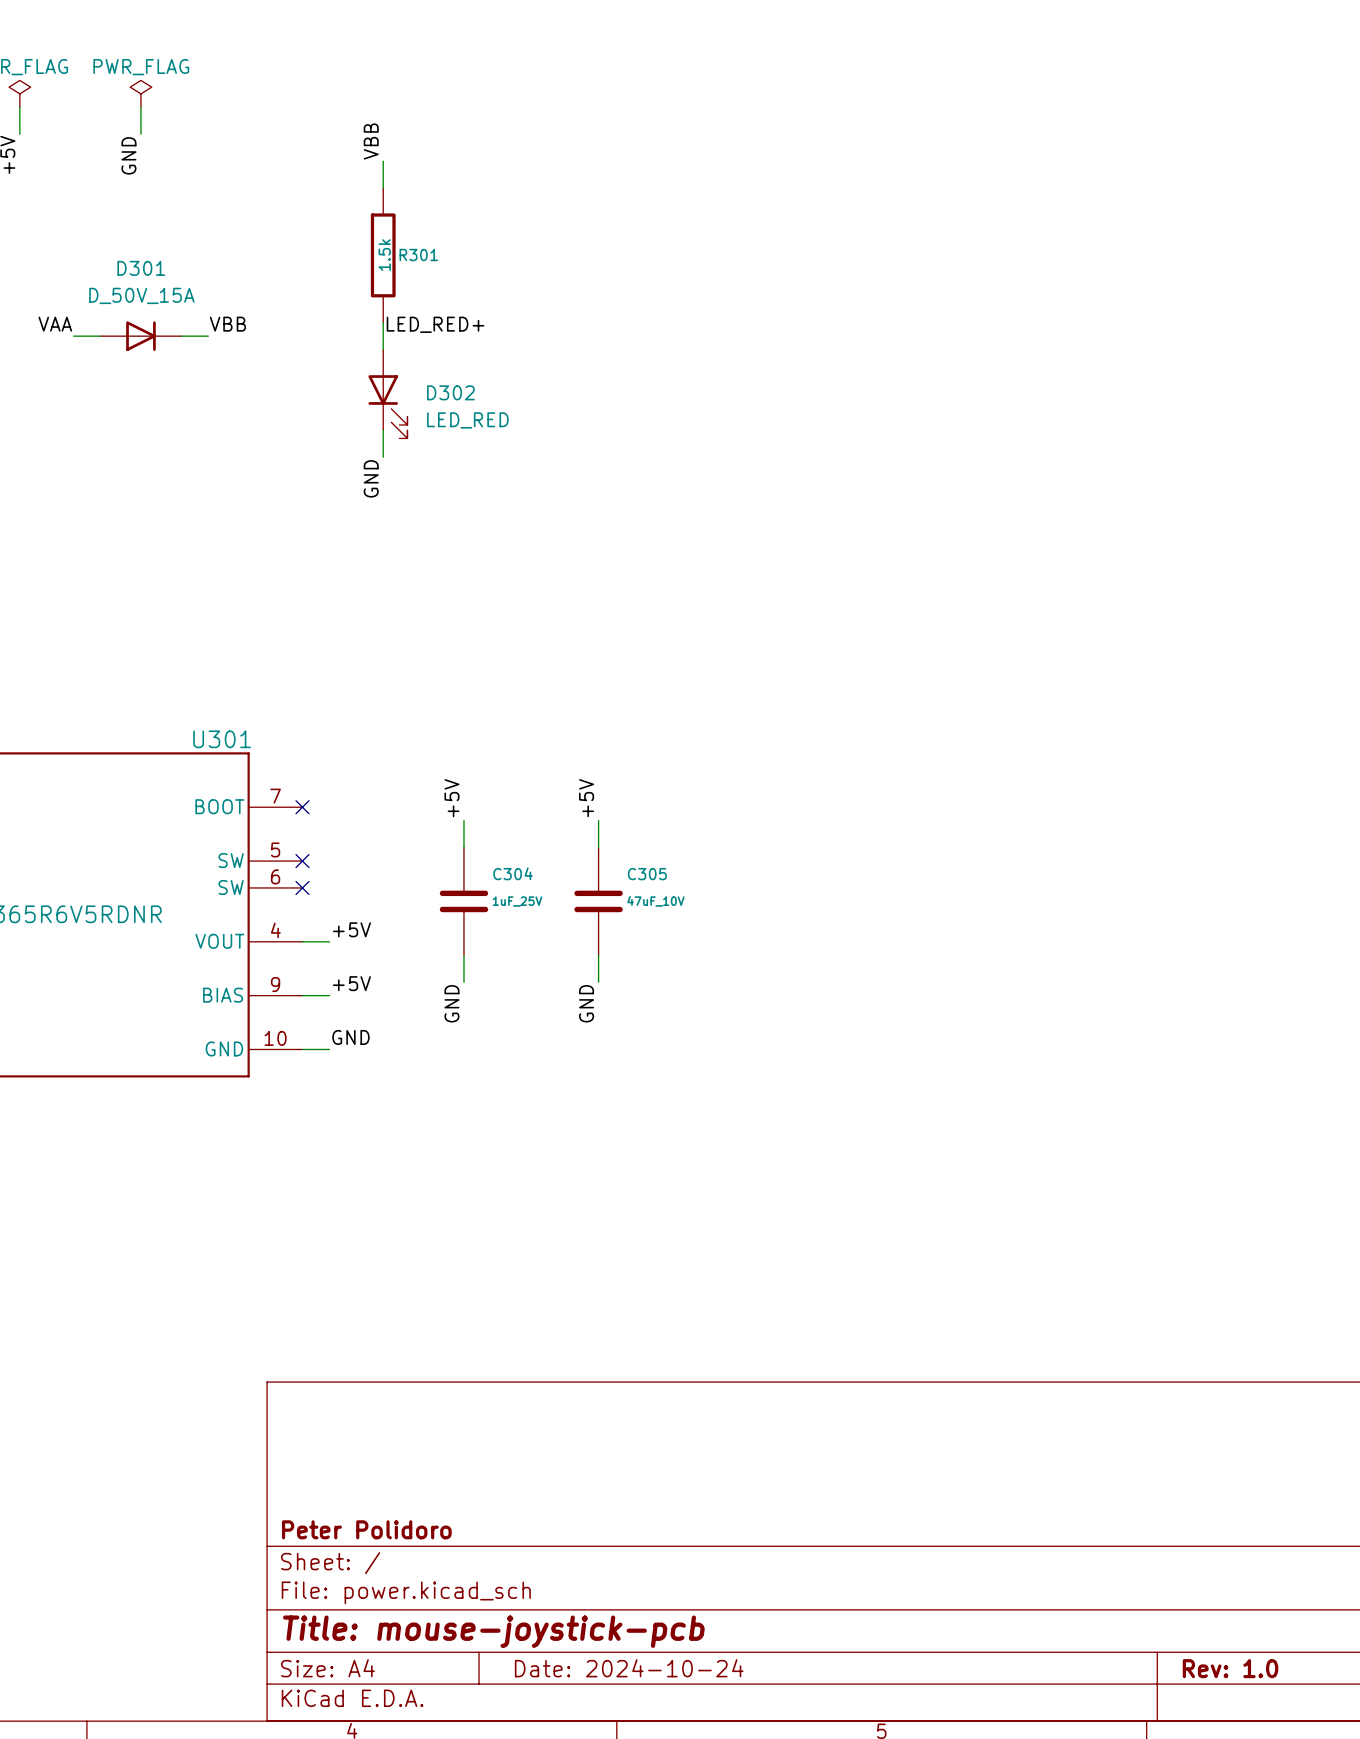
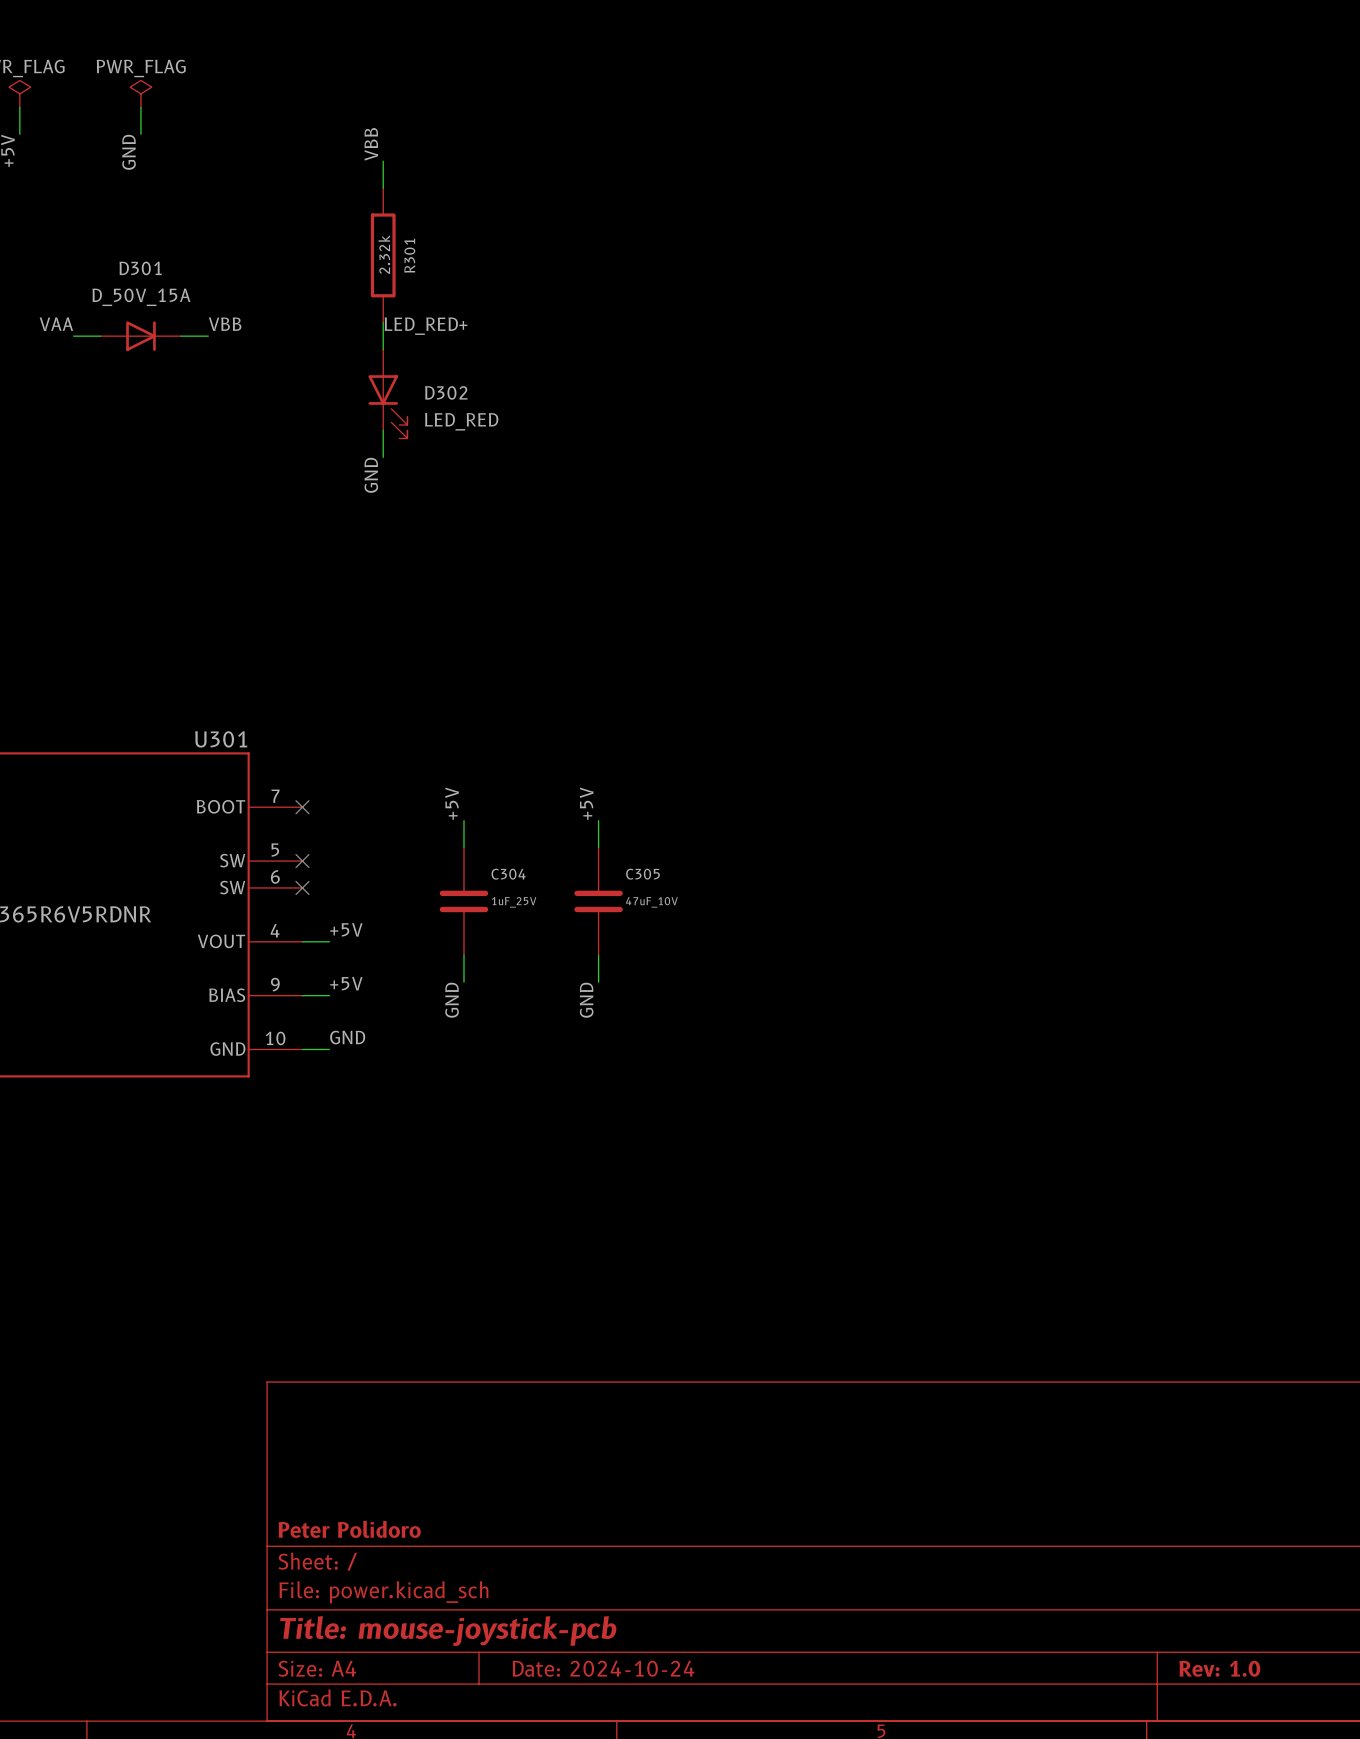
R301 value: 1.5k (384, 255) -> 2.32k (384, 254)
R301 name rotation: 0° (418, 255) -> 90° counterclockwise (409, 255)

